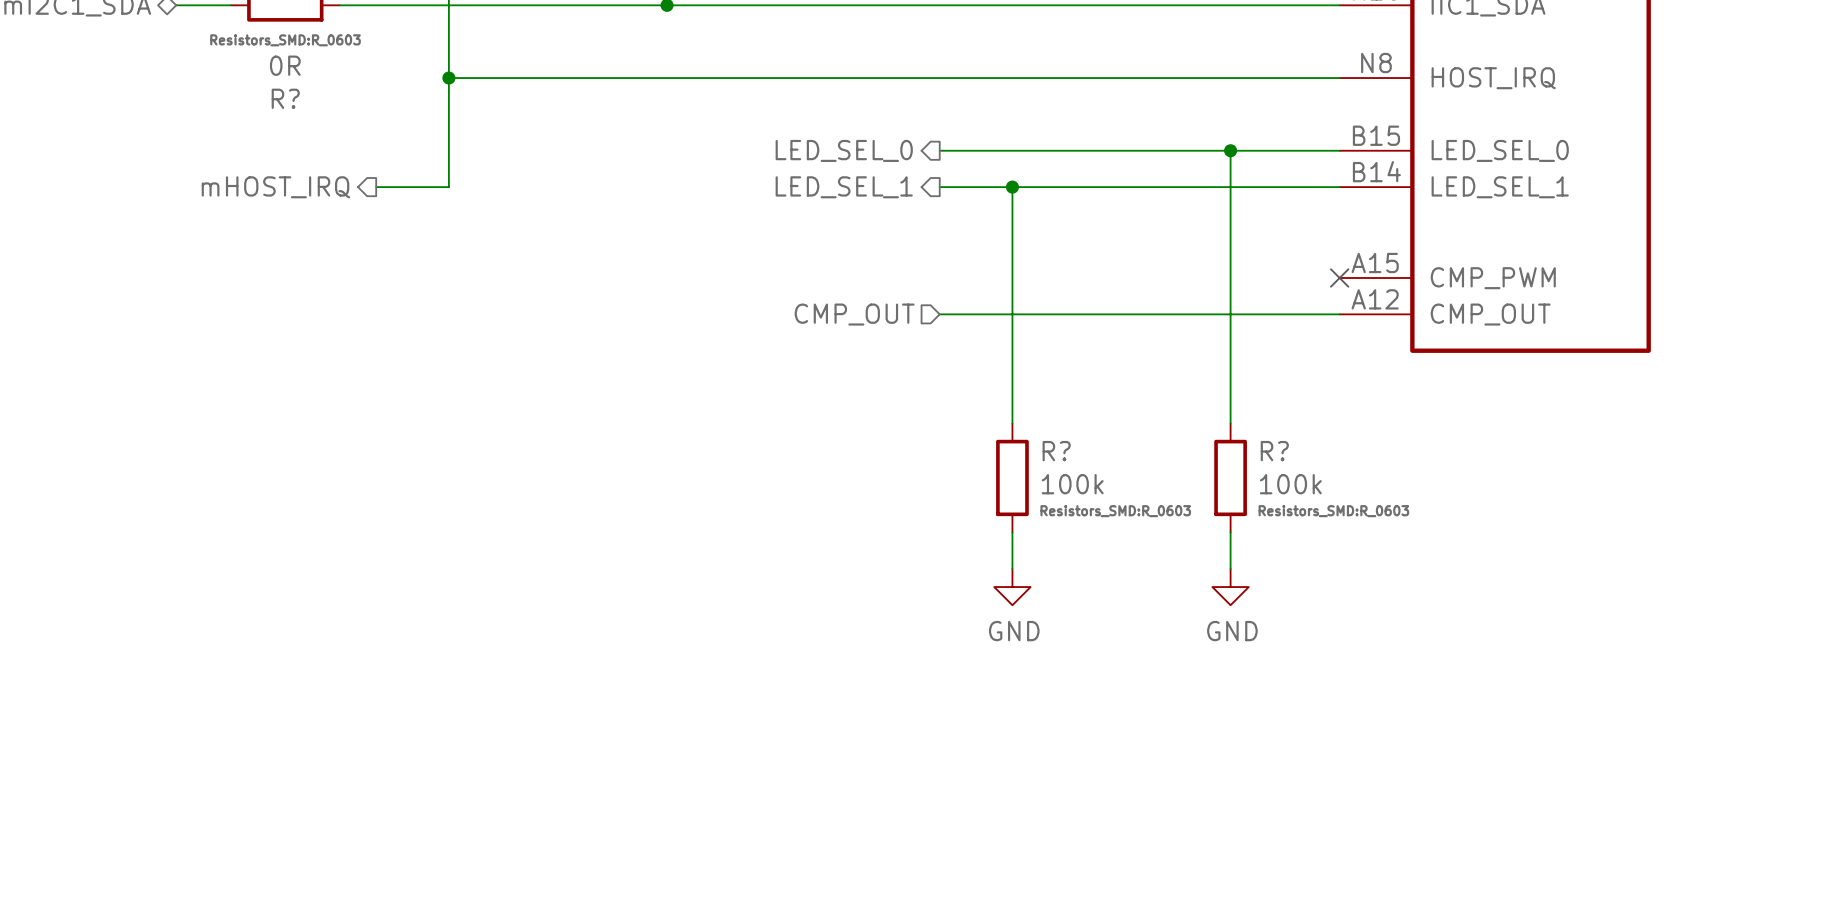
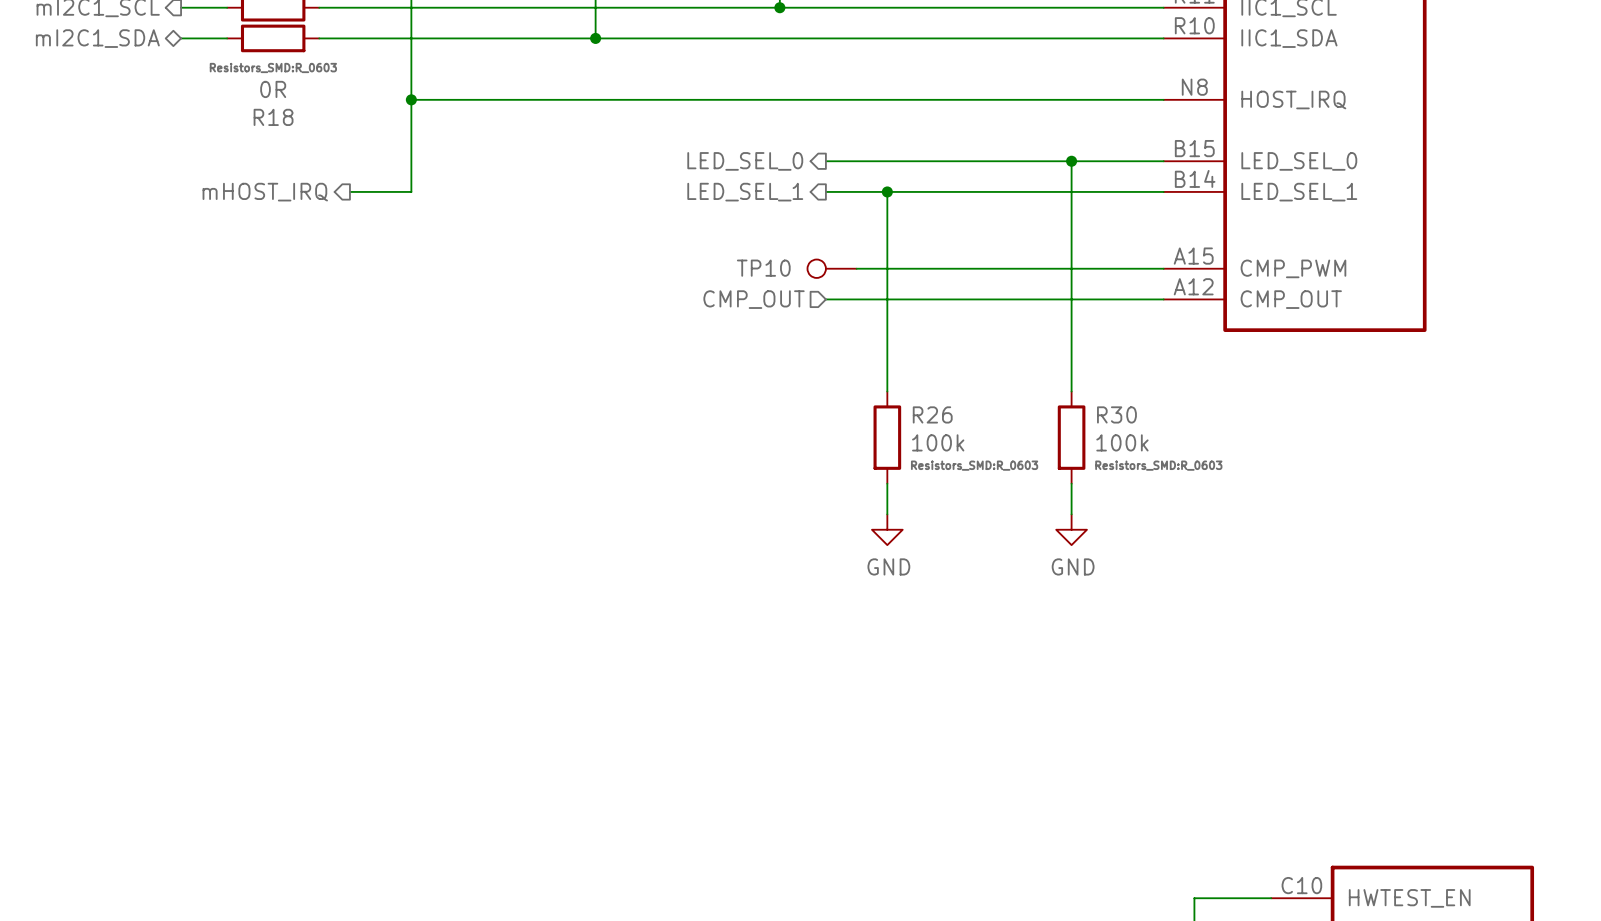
R? name: R? (285, 98) -> R18 (273, 117)
TP10: none -> (832, 268)
wire: none -> (856, 268) (1163, 268)
no-connect mark: (1339, 278) -> none
R? name: R? (1056, 451) -> R26 (932, 414)
R? name: R? (1274, 451) -> R30 (1116, 414)

